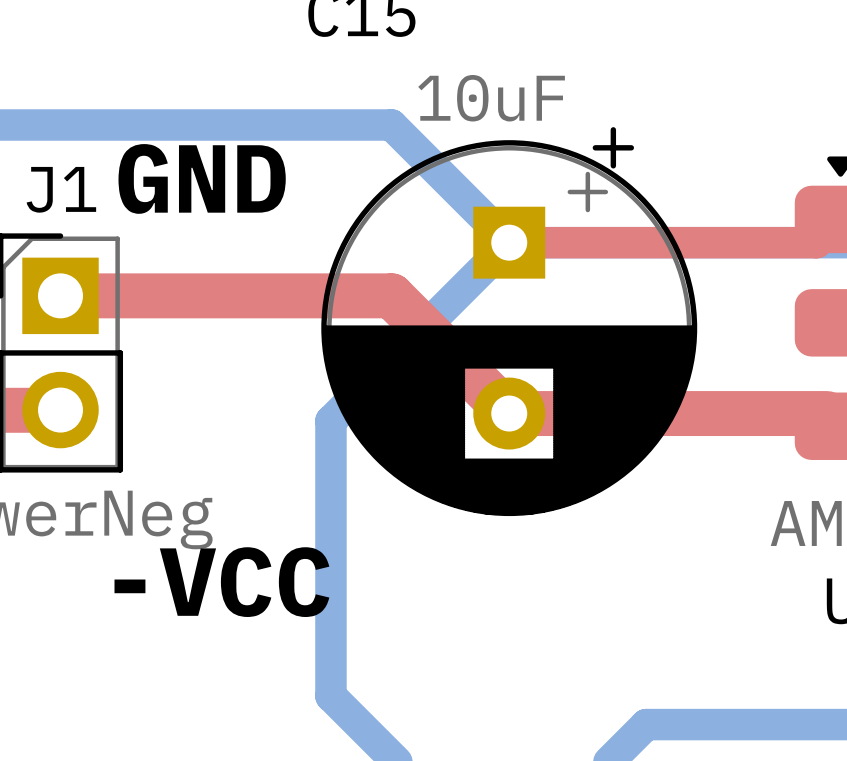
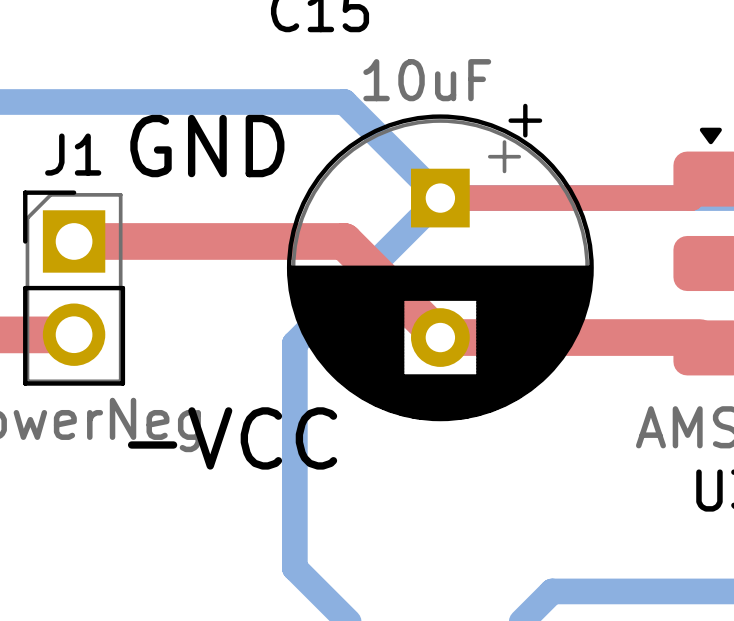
text position: -VCC (221, 582) -> -VCC (232, 438)

